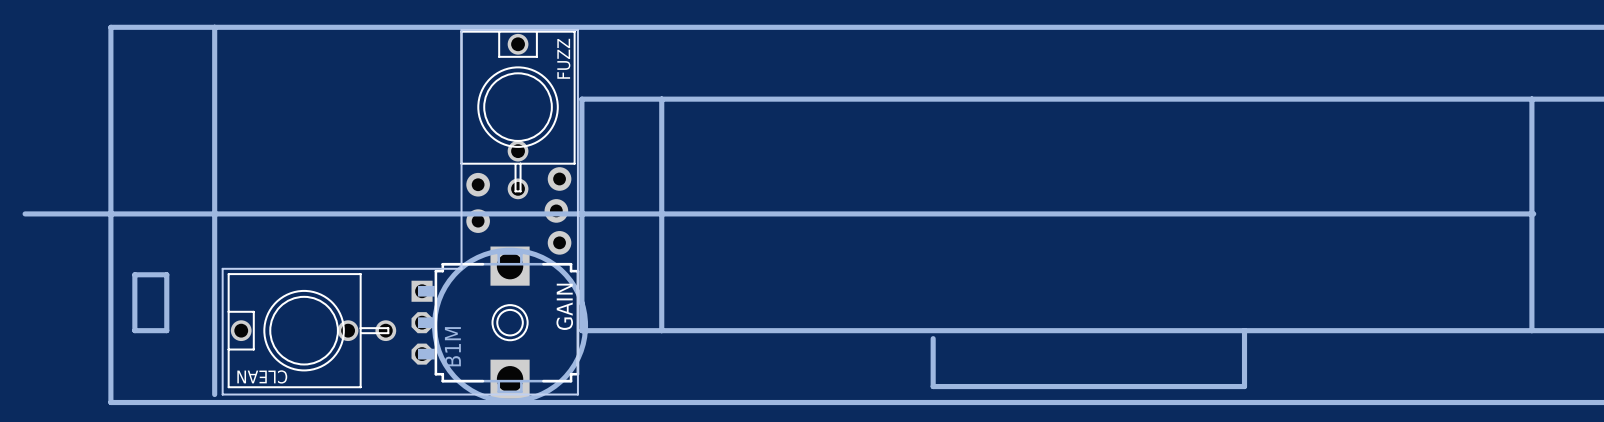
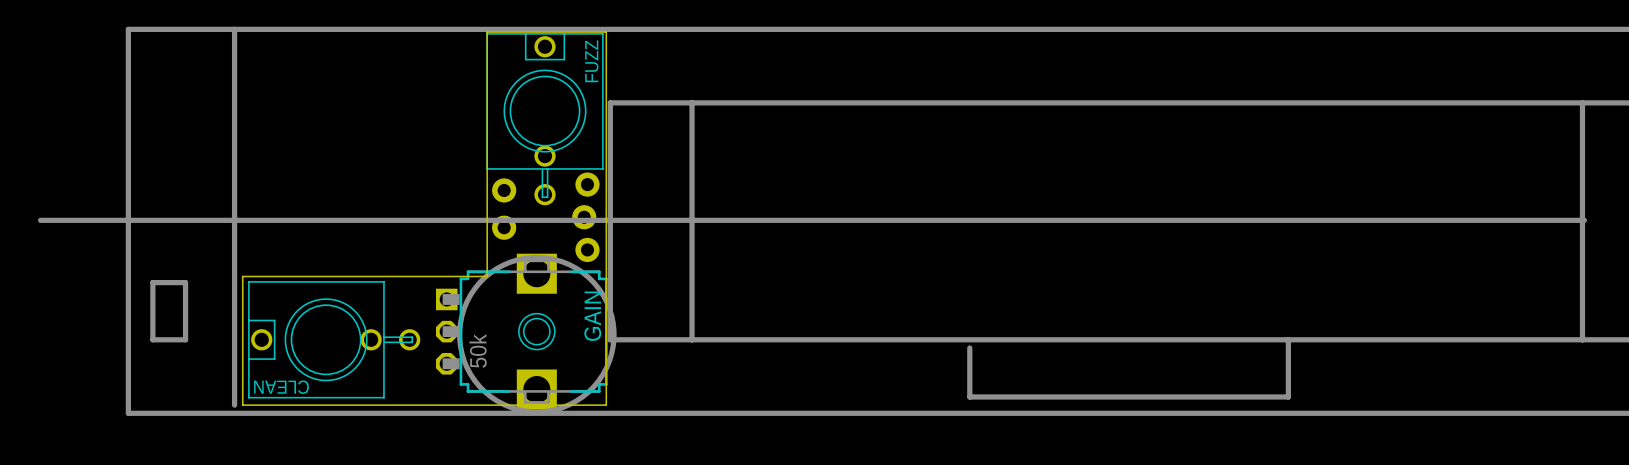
GAIN value: B1M (452, 346) -> 50k (478, 350)

